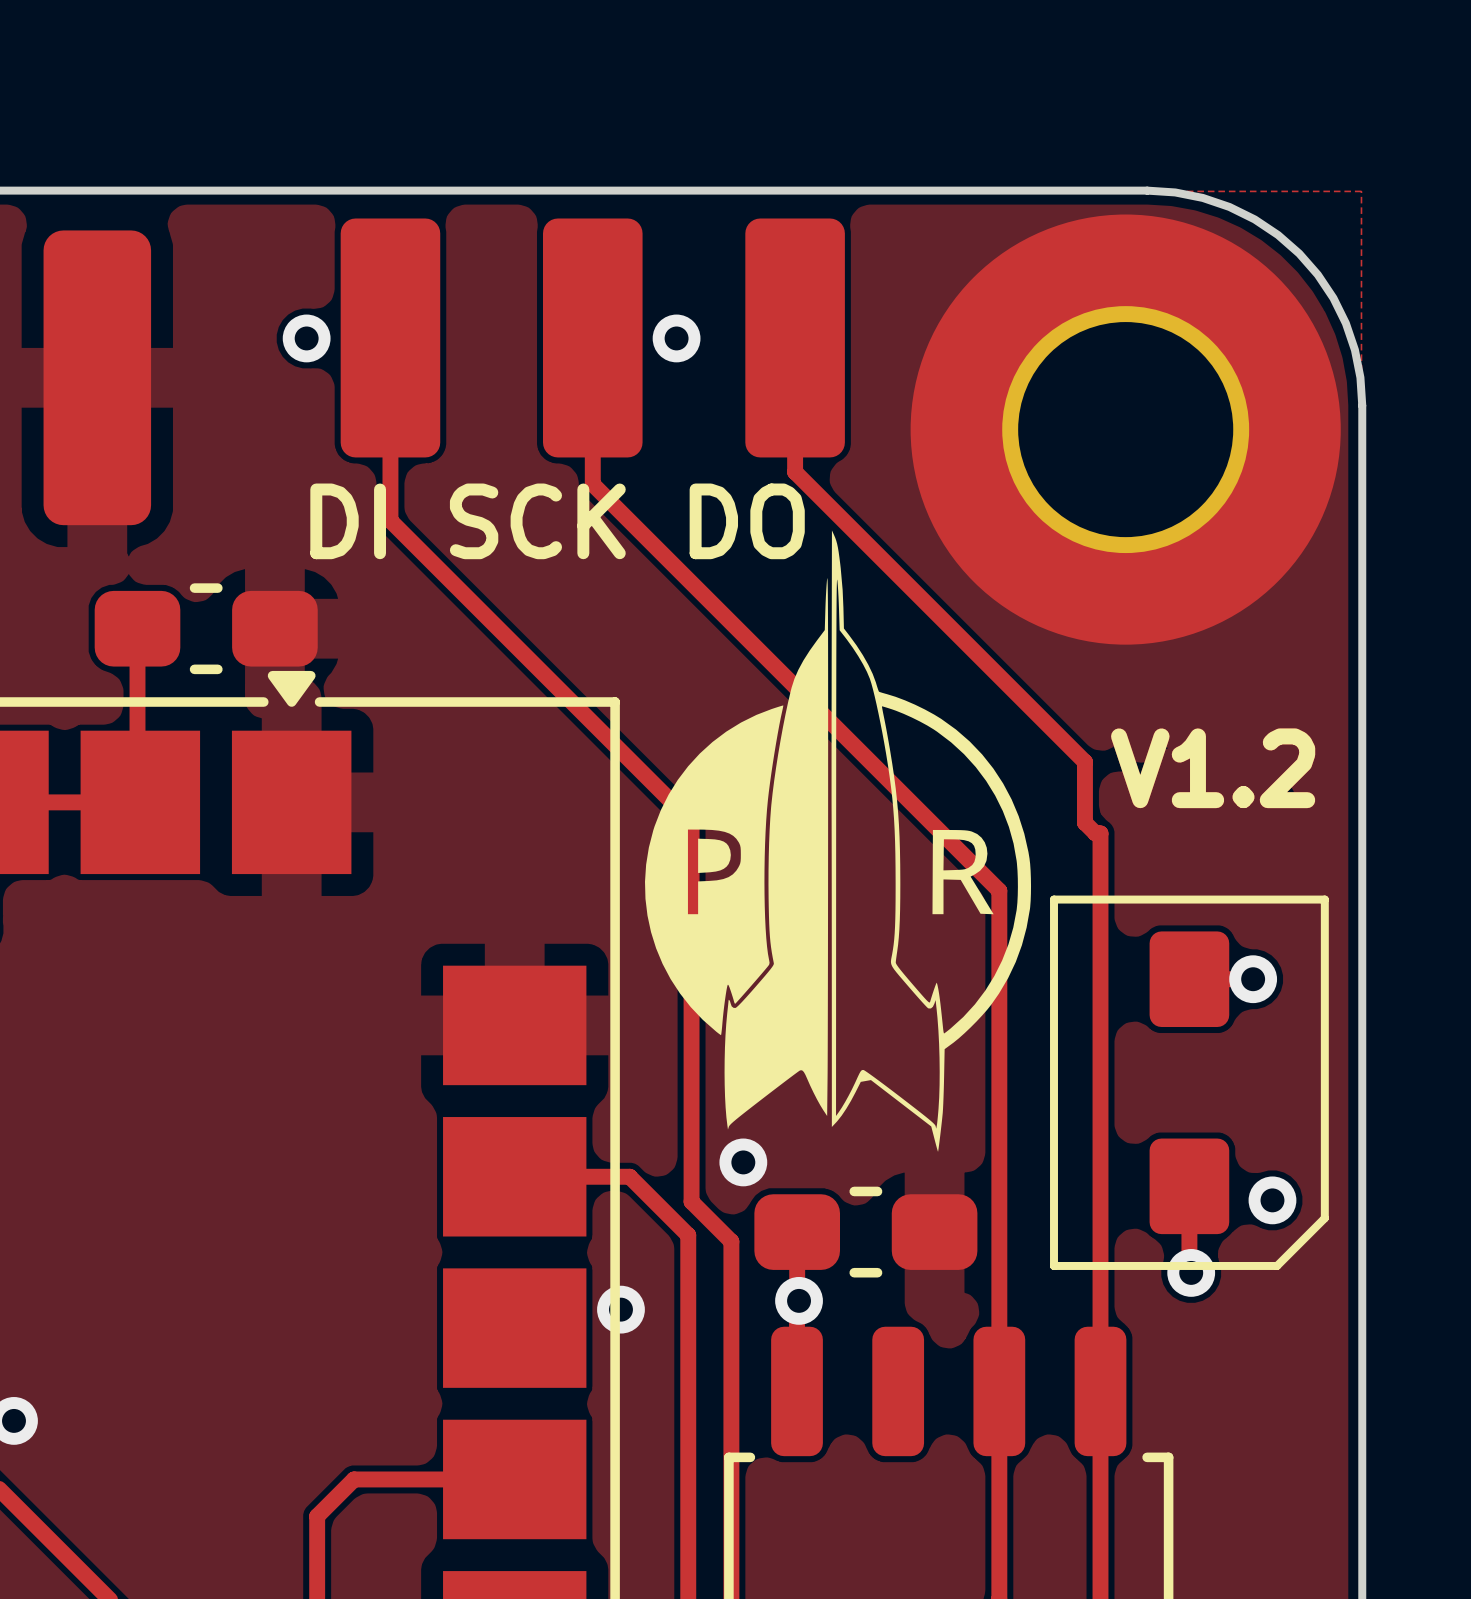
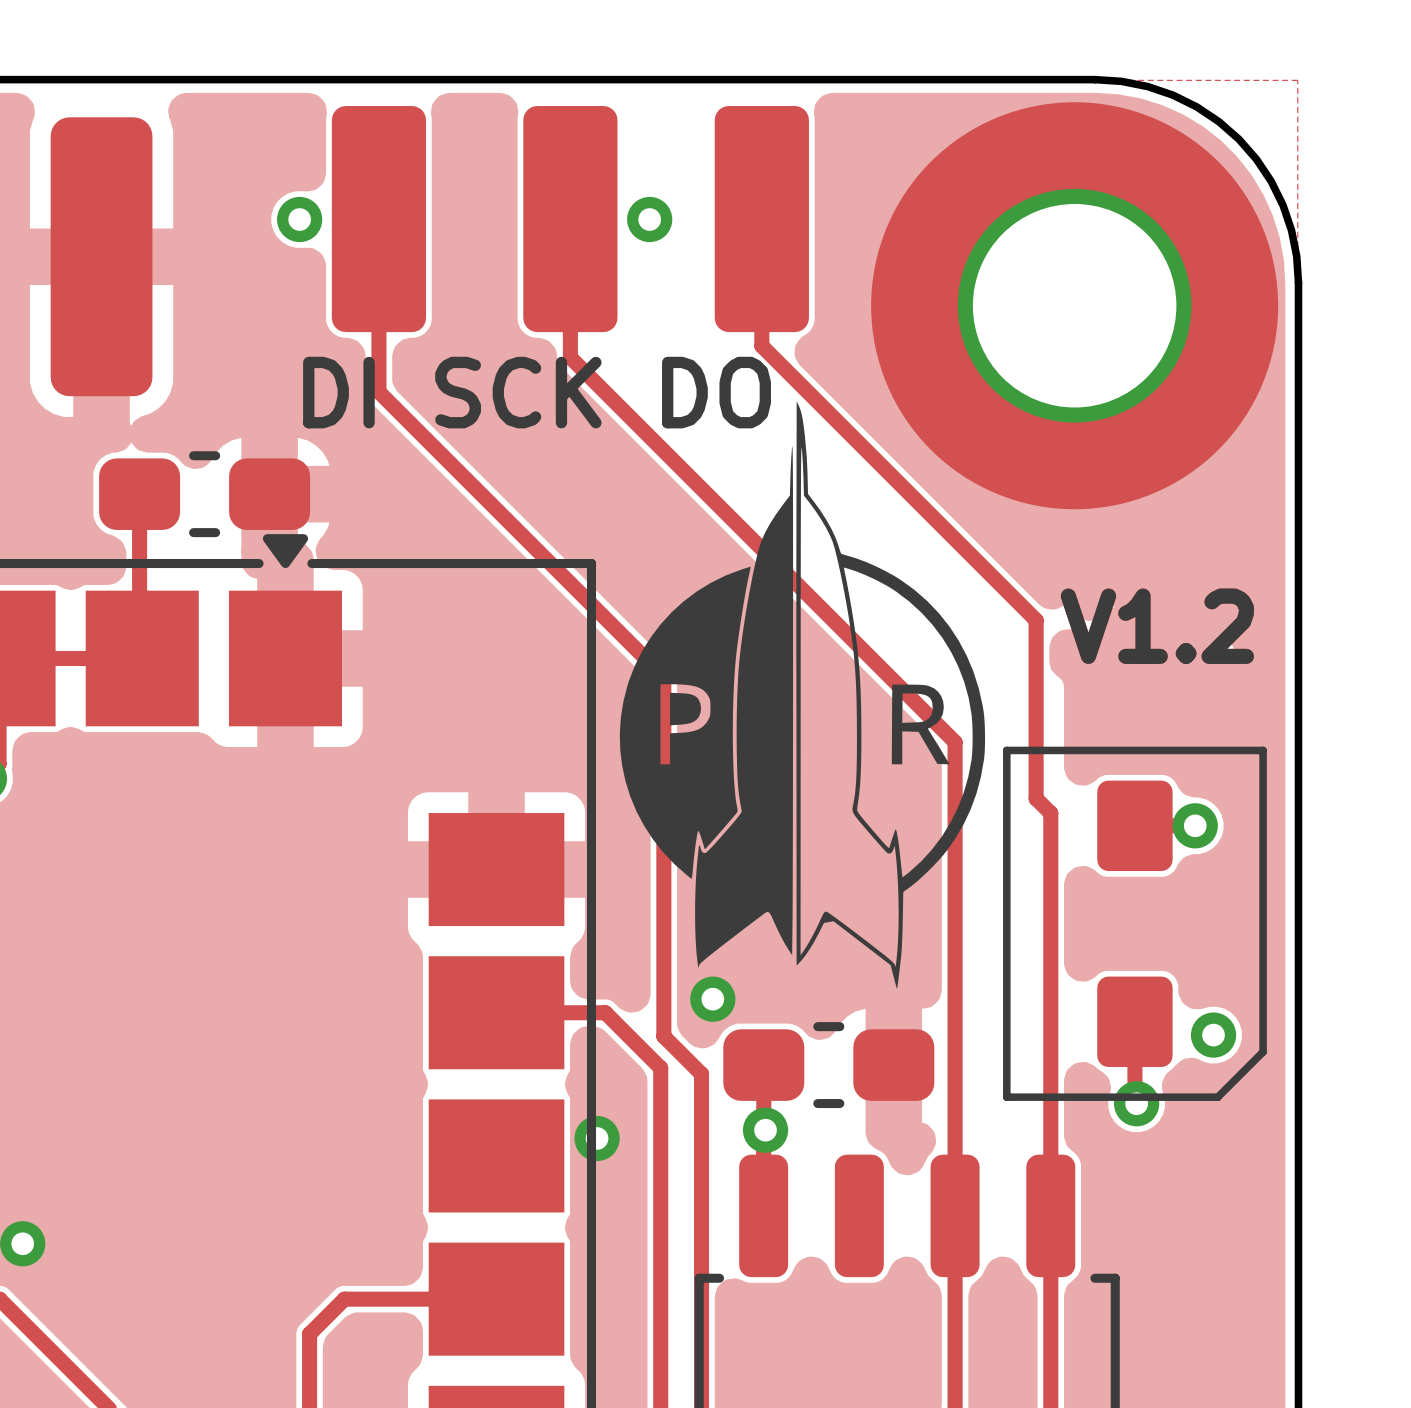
track: (1084, 822) (1095, 833) (1100, 833) (1100, 965) -> (1036, 677) (1036, 798) (1050, 813)

